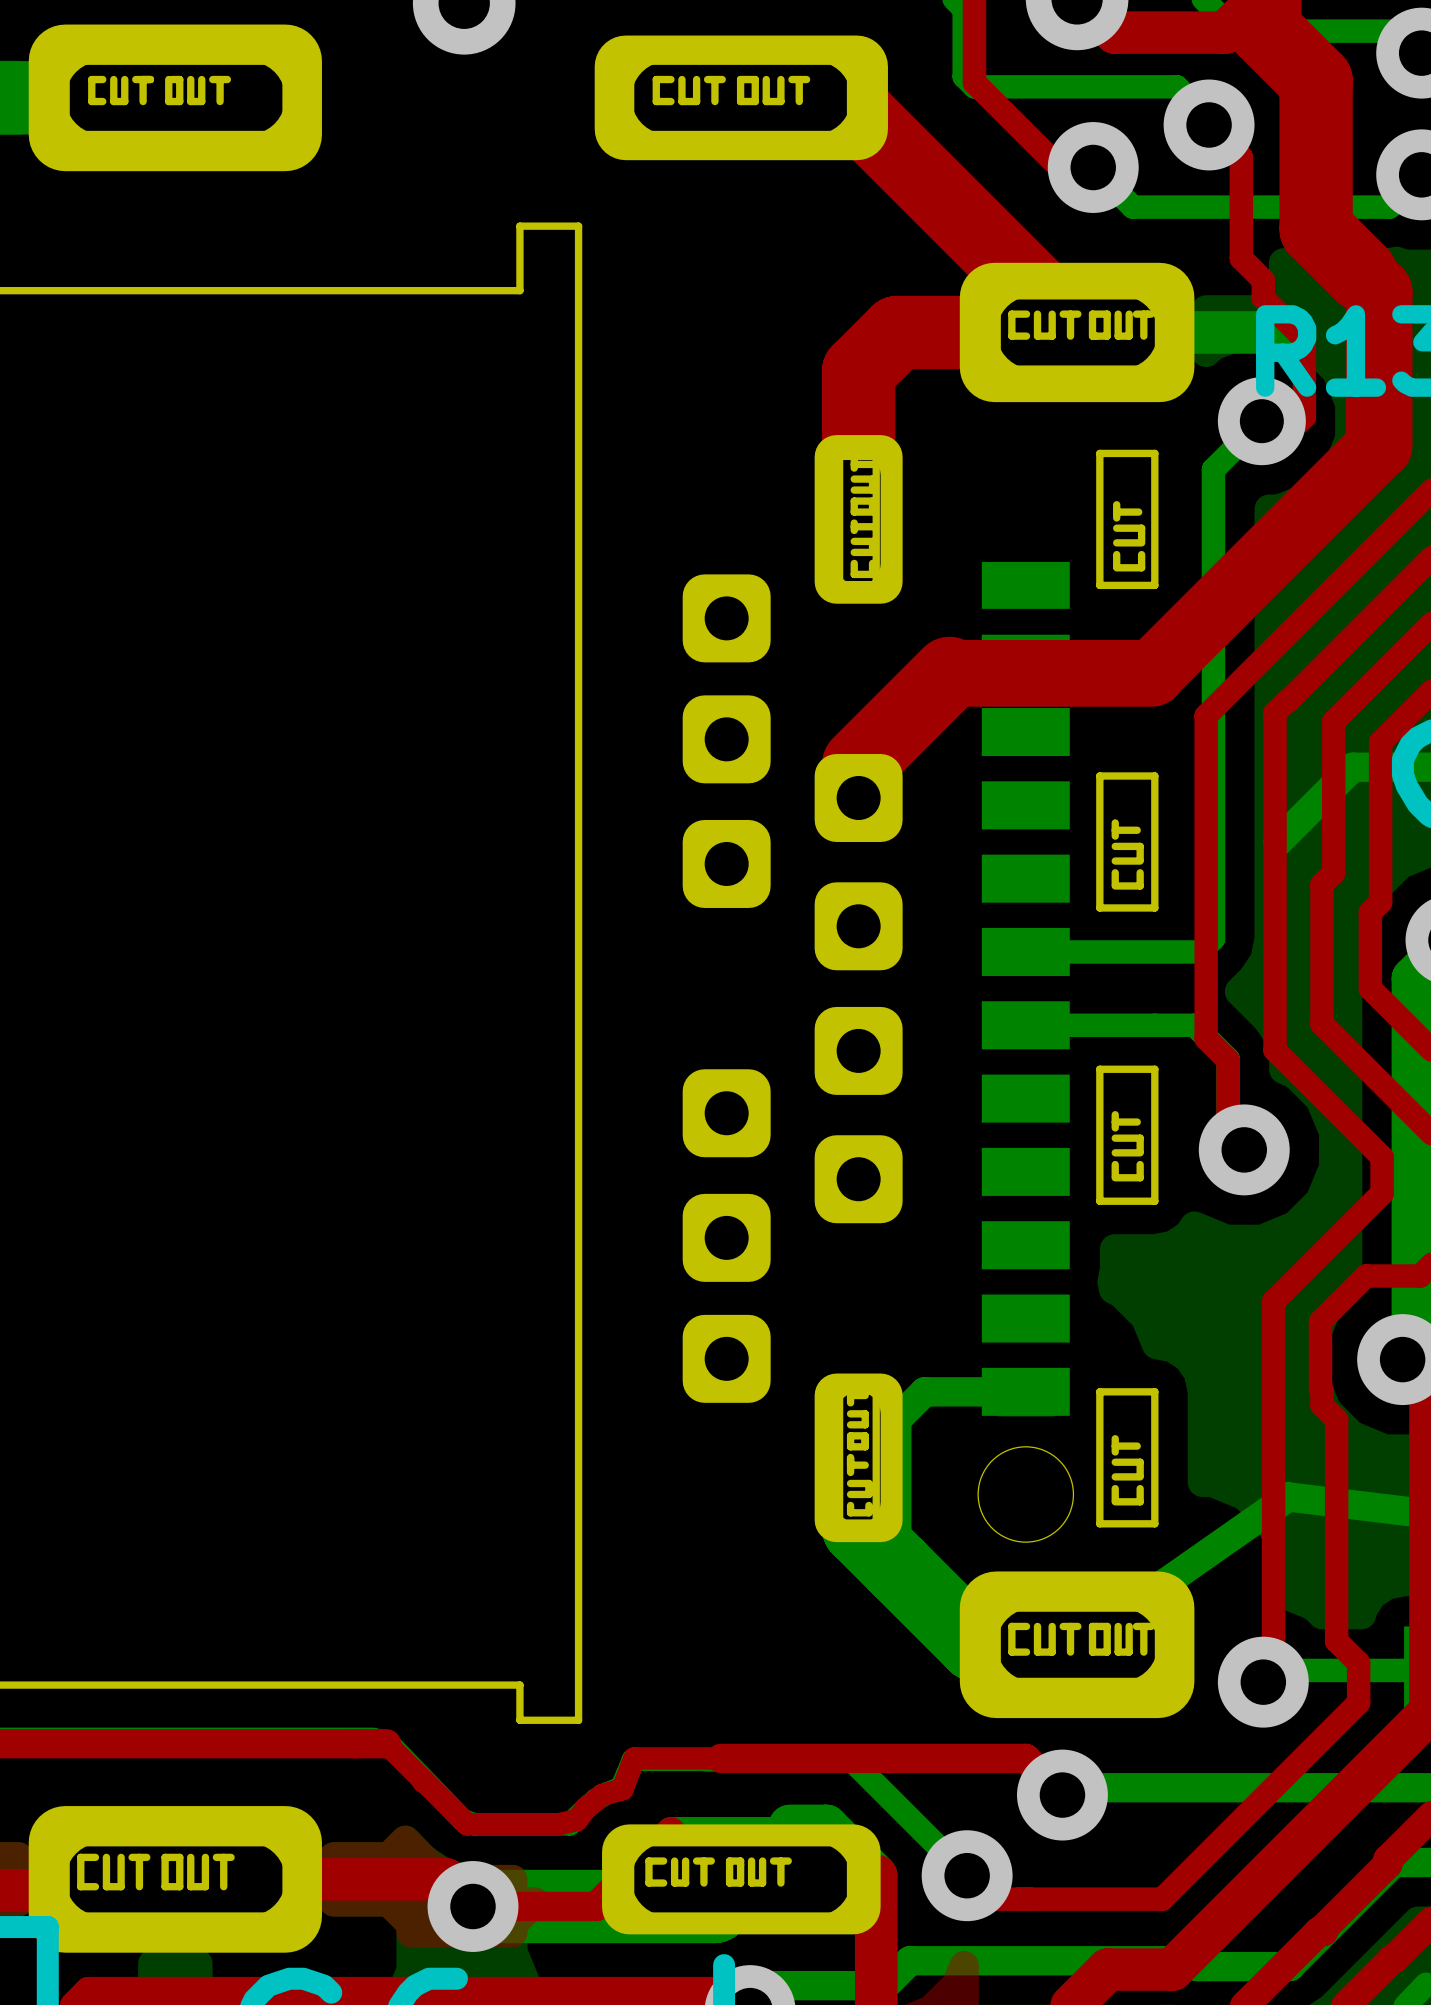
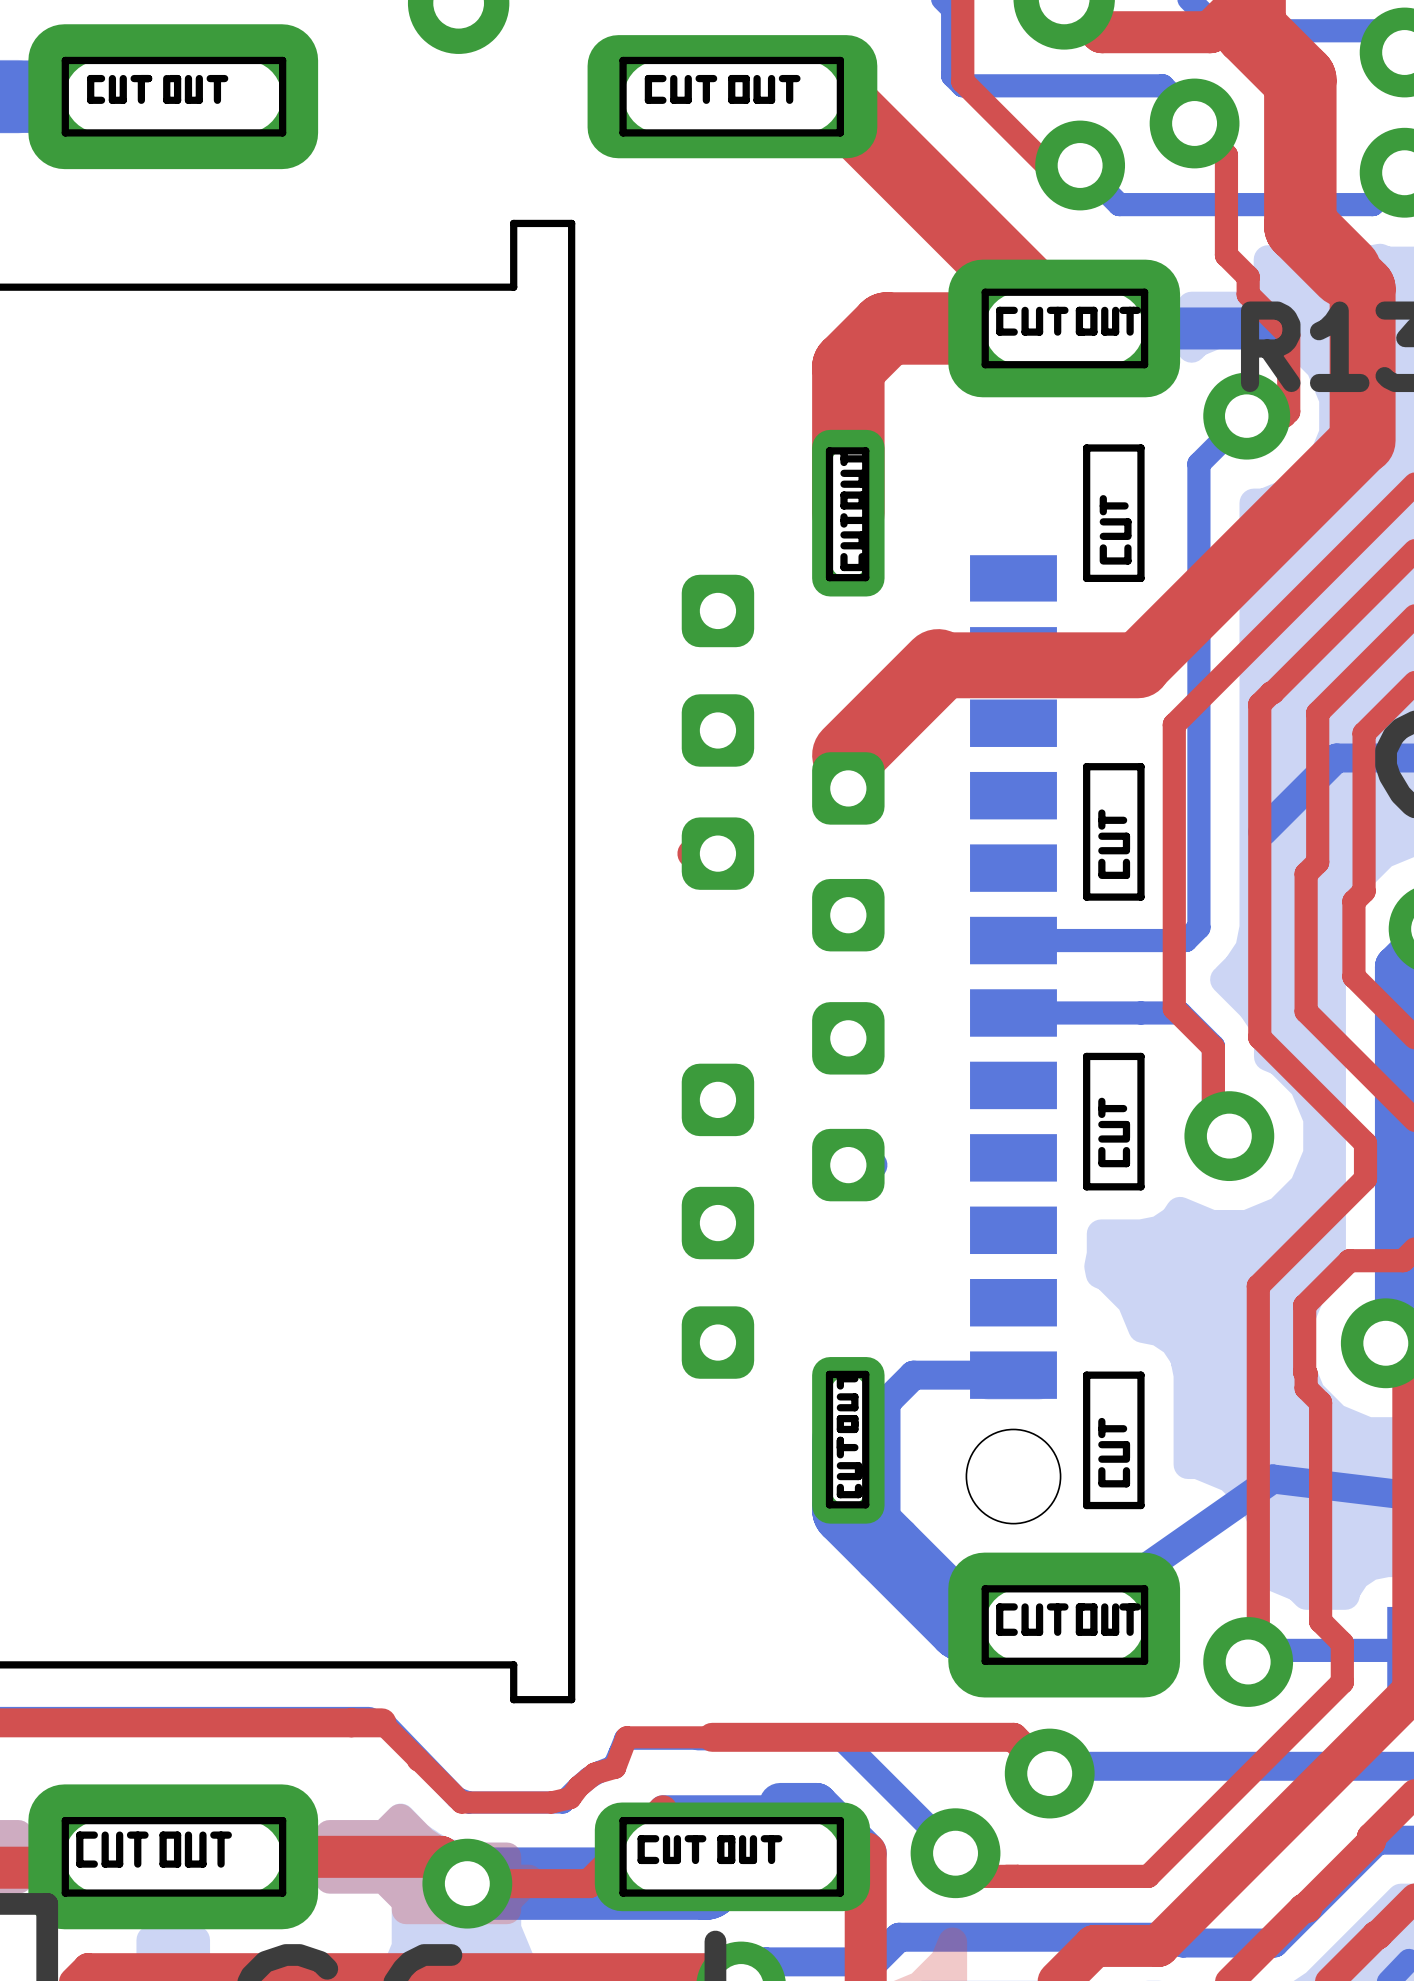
part footprint: [28, 24, 1195, 1953] -> [28, 24, 1181, 1930]
top track: (1206, 715) (1206, 1038) -> (1191, 707) (1174, 724) (1174, 1008) (1191, 1026)

